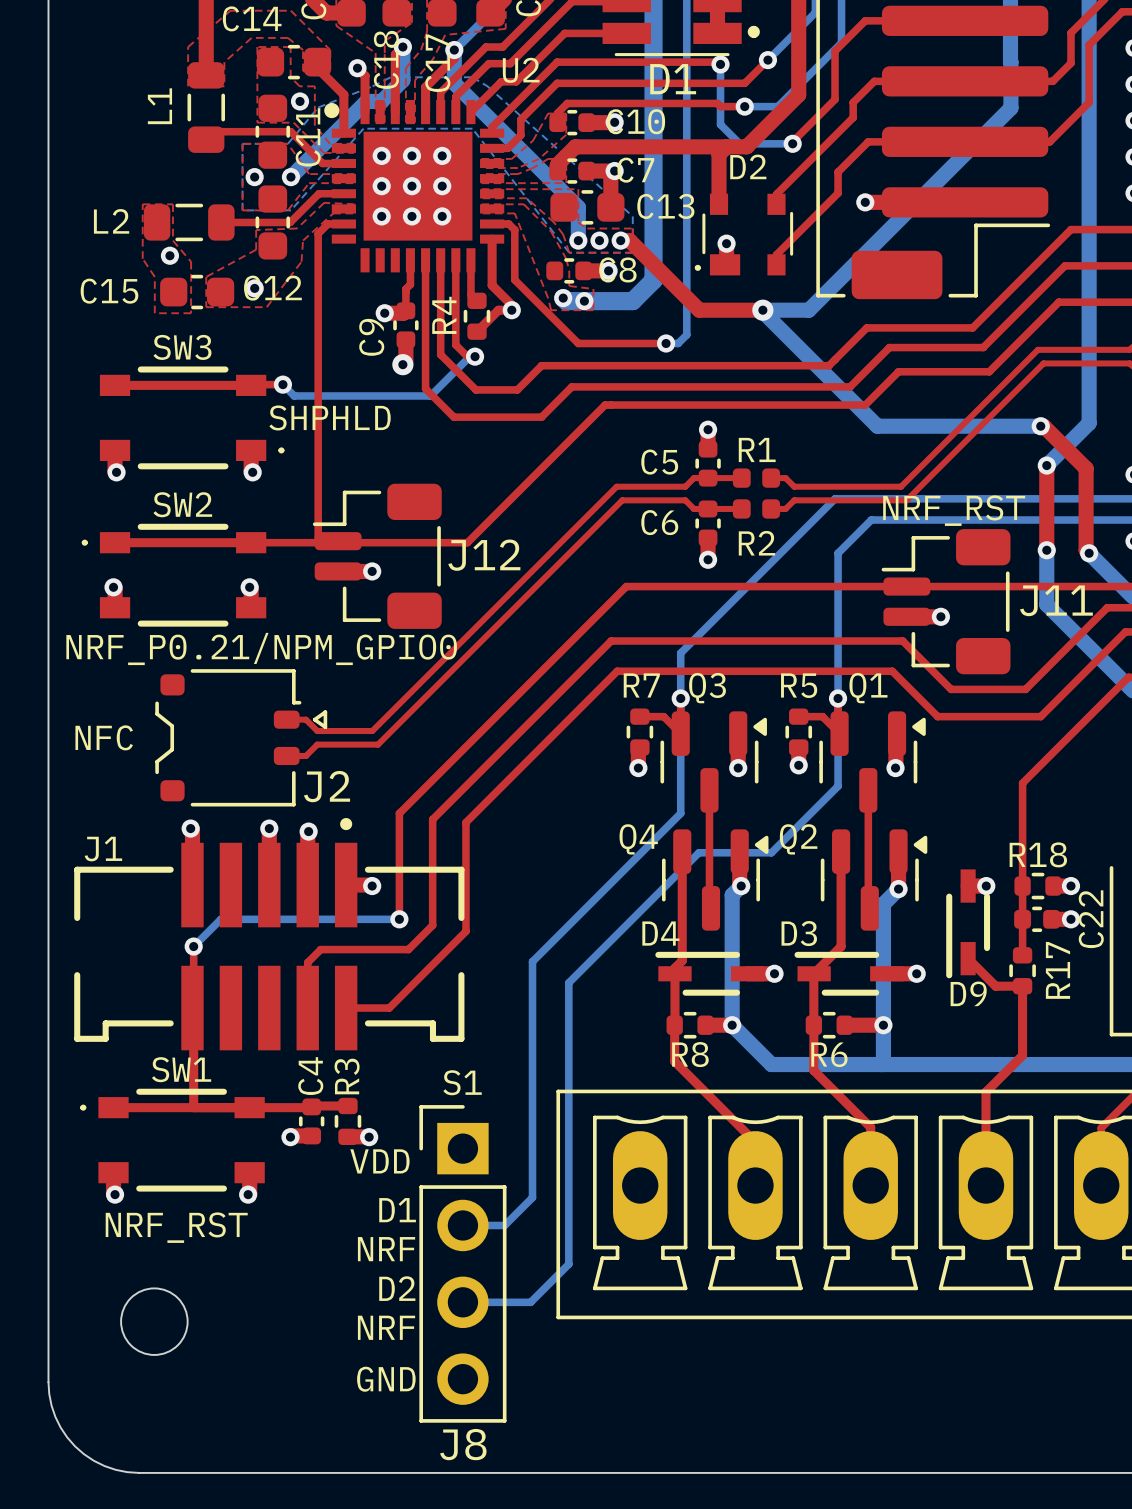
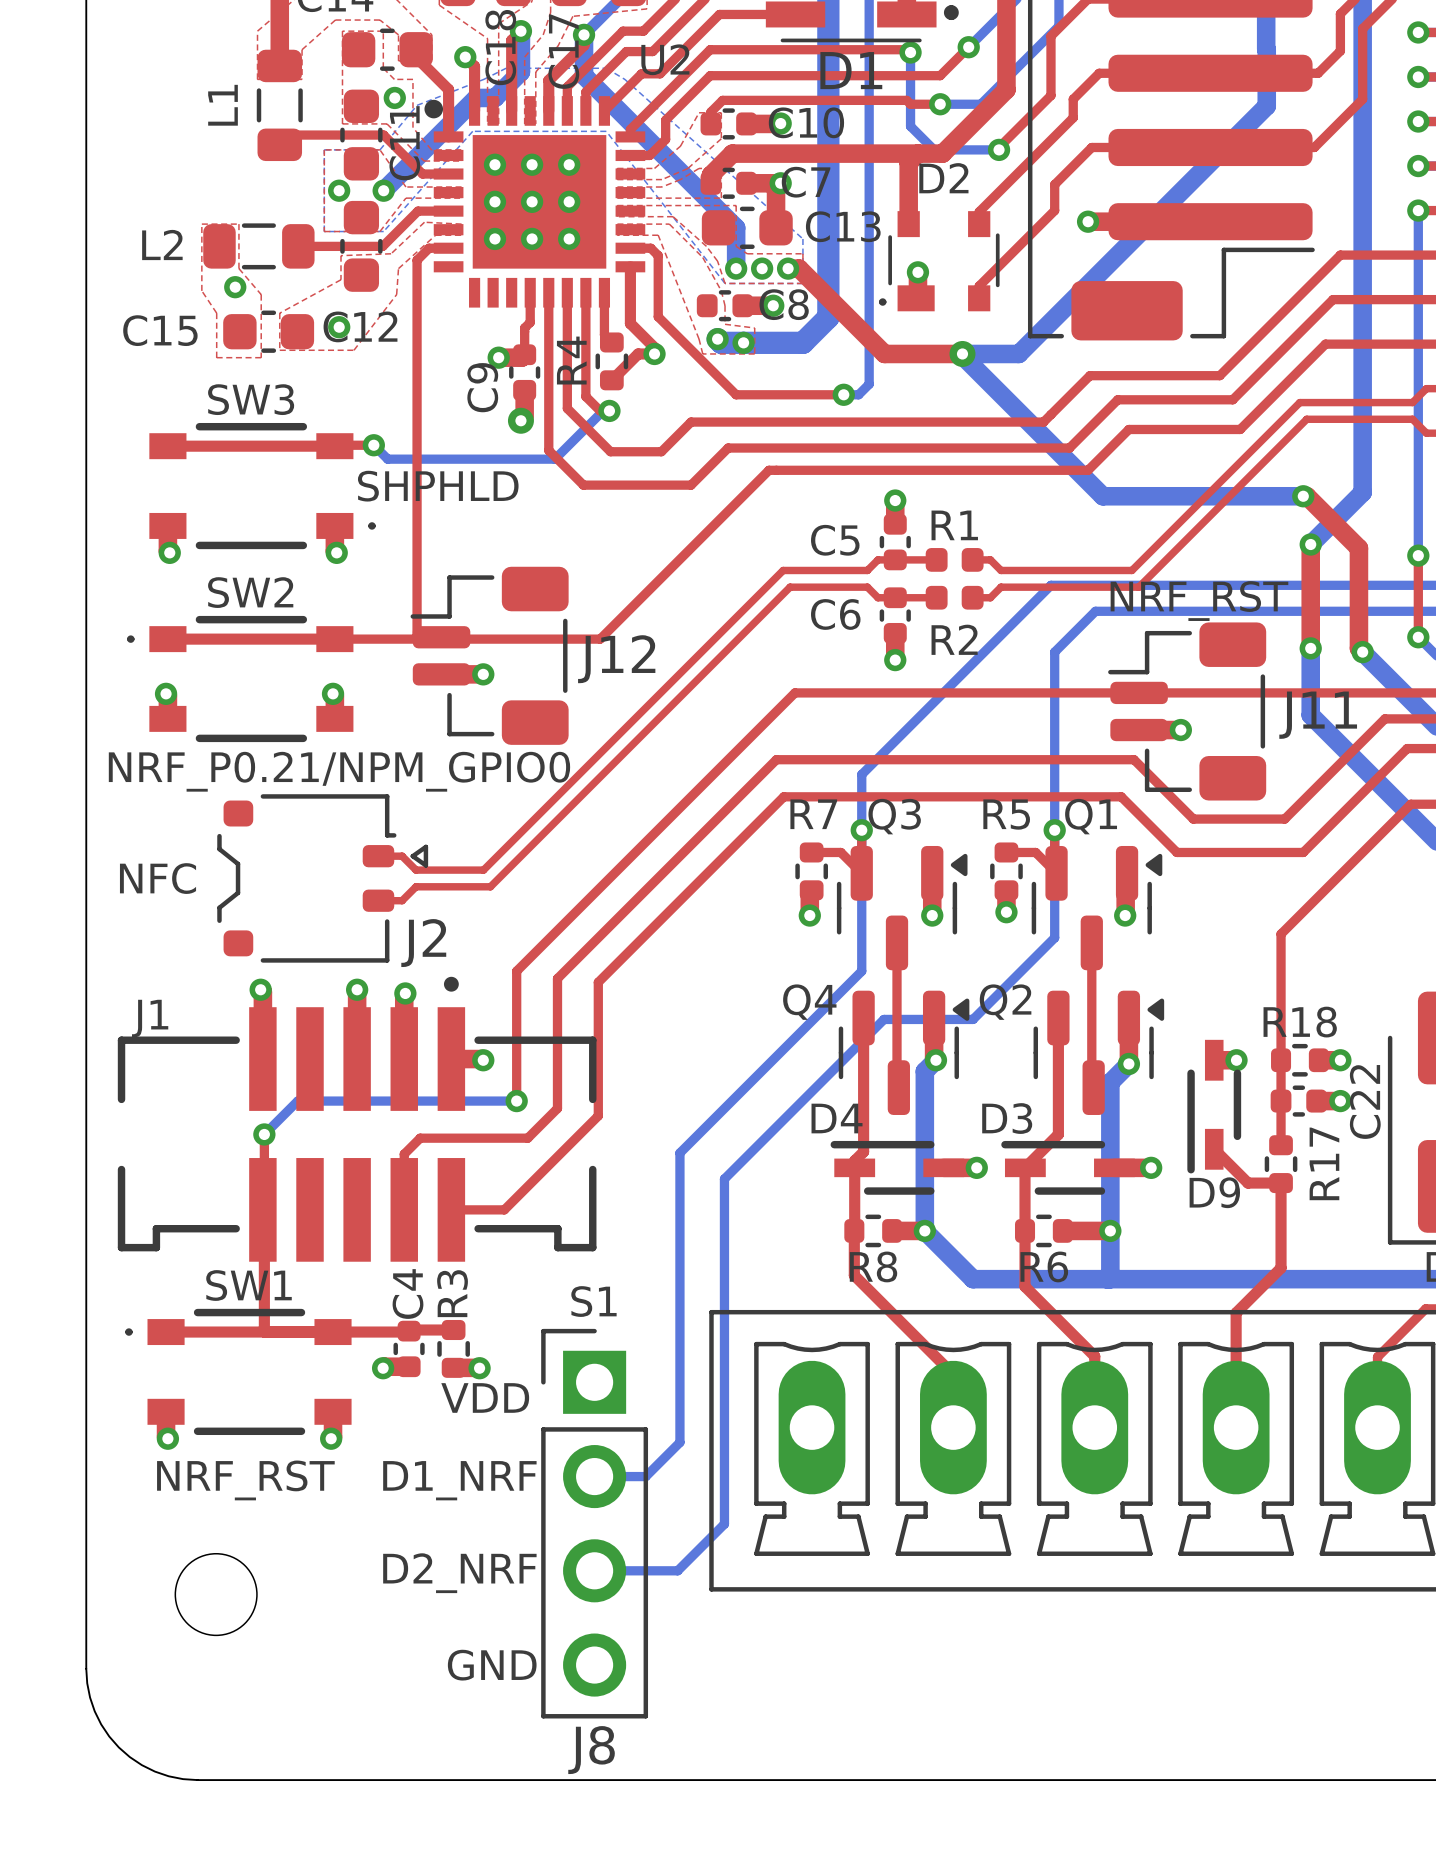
text: D1 (397, 1210) -> none
text: NRF (386, 1249) -> D1_NRF (459, 1480)
text: D2 (397, 1288) -> D2_NRF (459, 1573)
text: NRF (386, 1327) -> none

